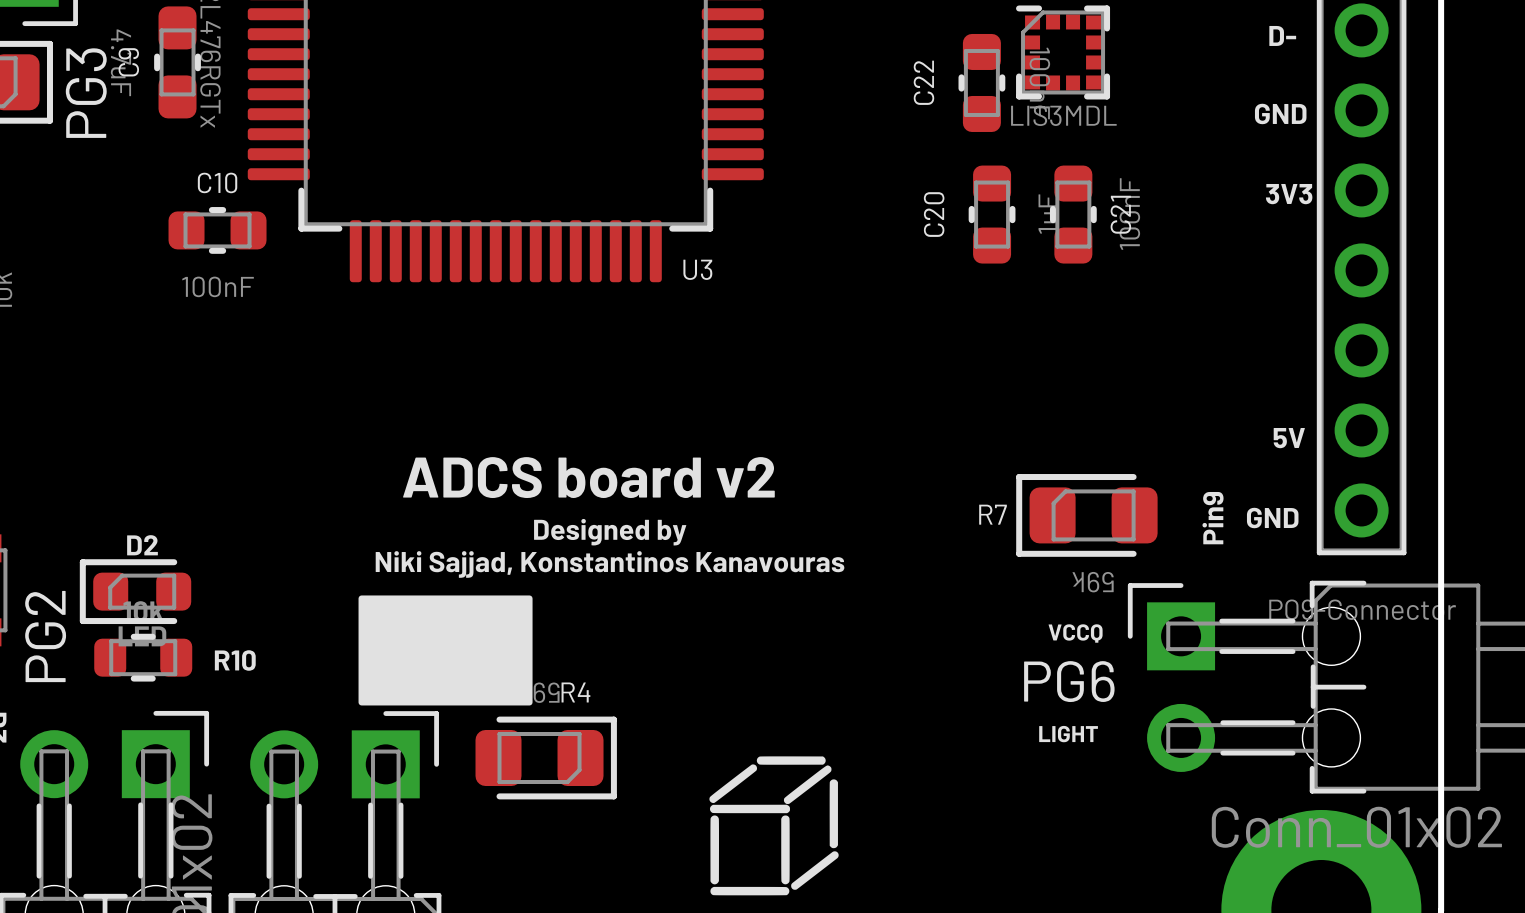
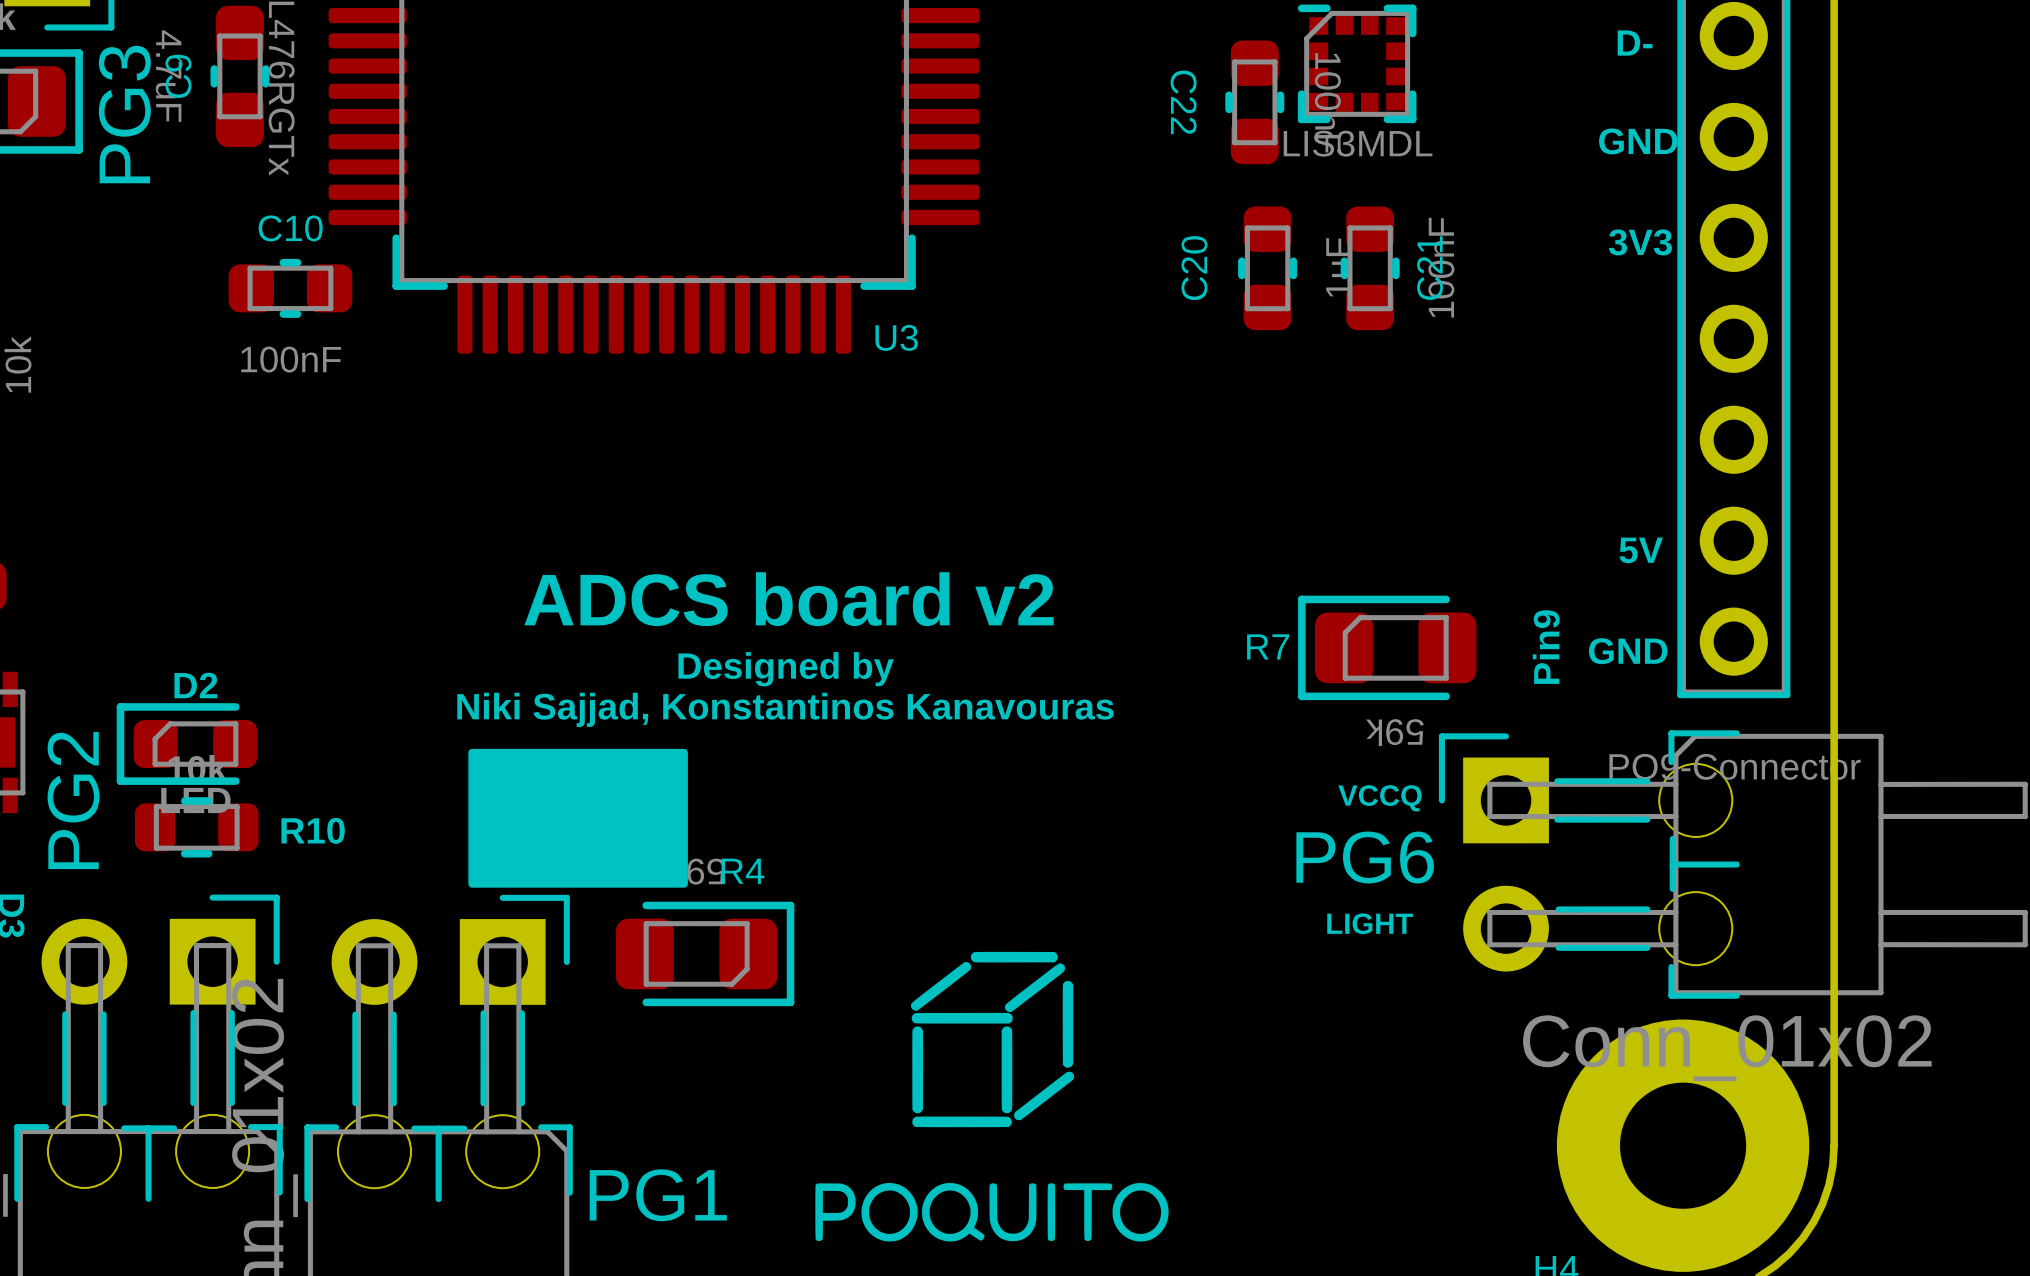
C22 name rotation: 0° (923, 82) -> 180° (1183, 102)

